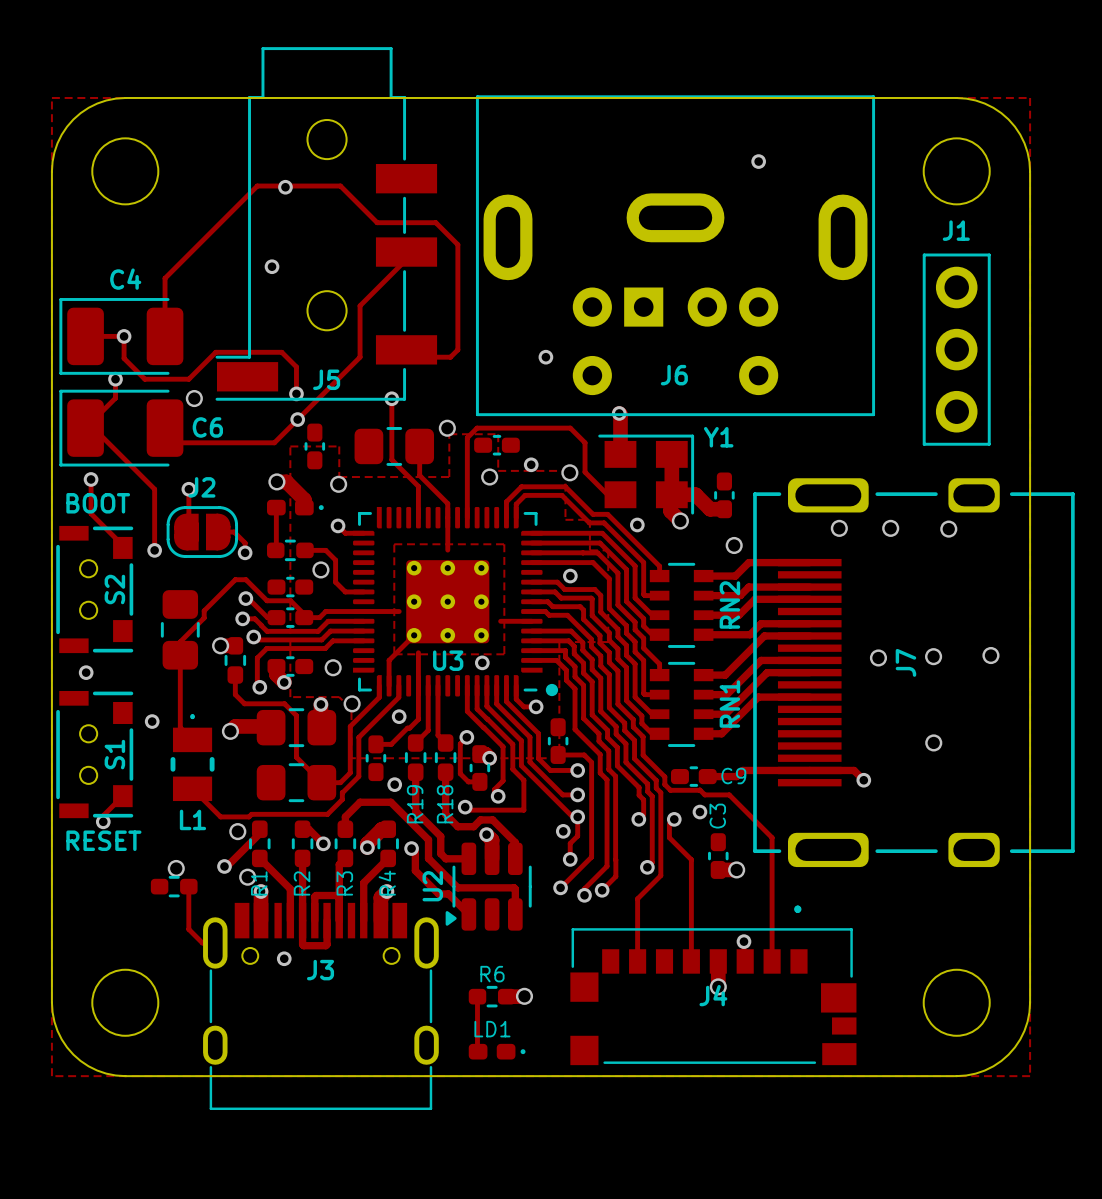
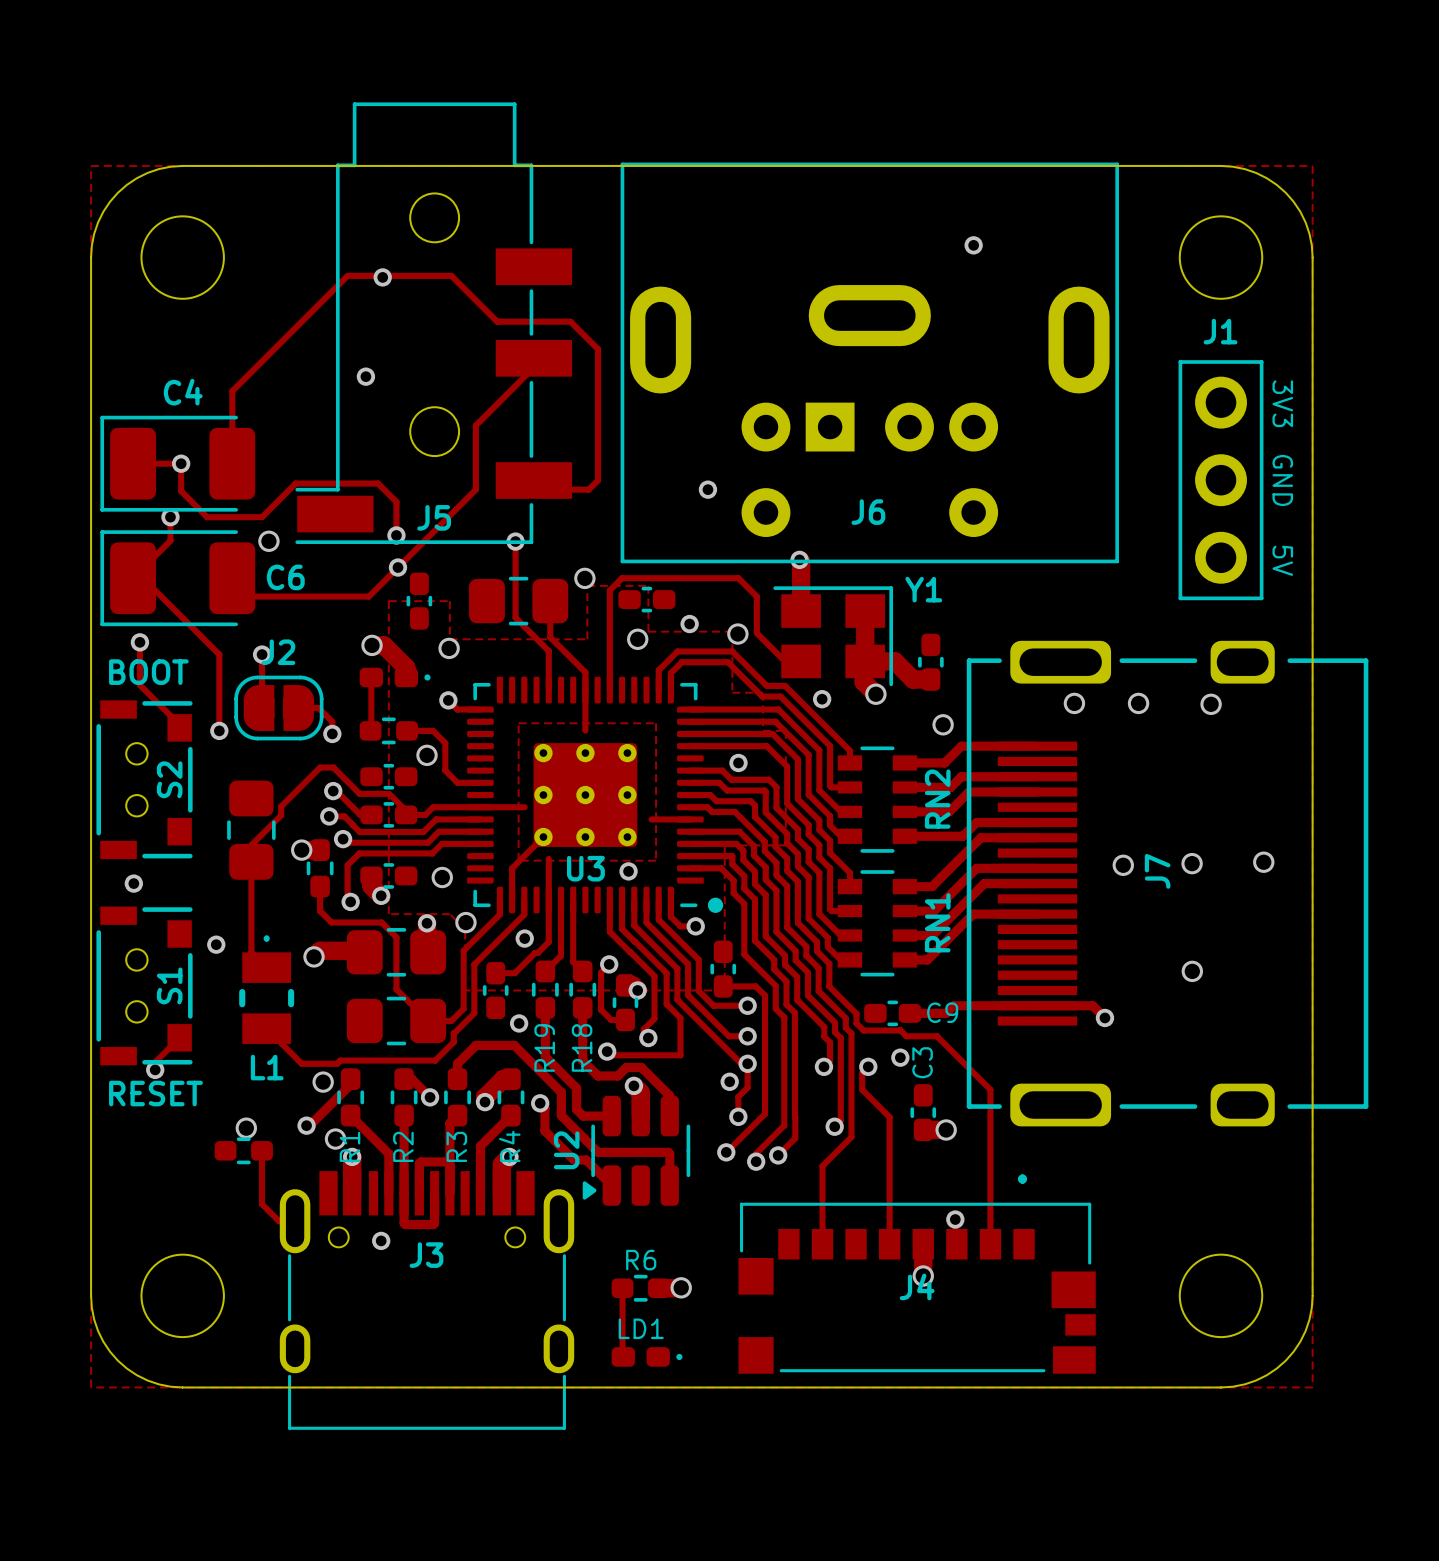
text: none -> 3V3 (1282, 403)
text: none -> GND (1282, 480)
text: none -> 5V (1282, 560)

